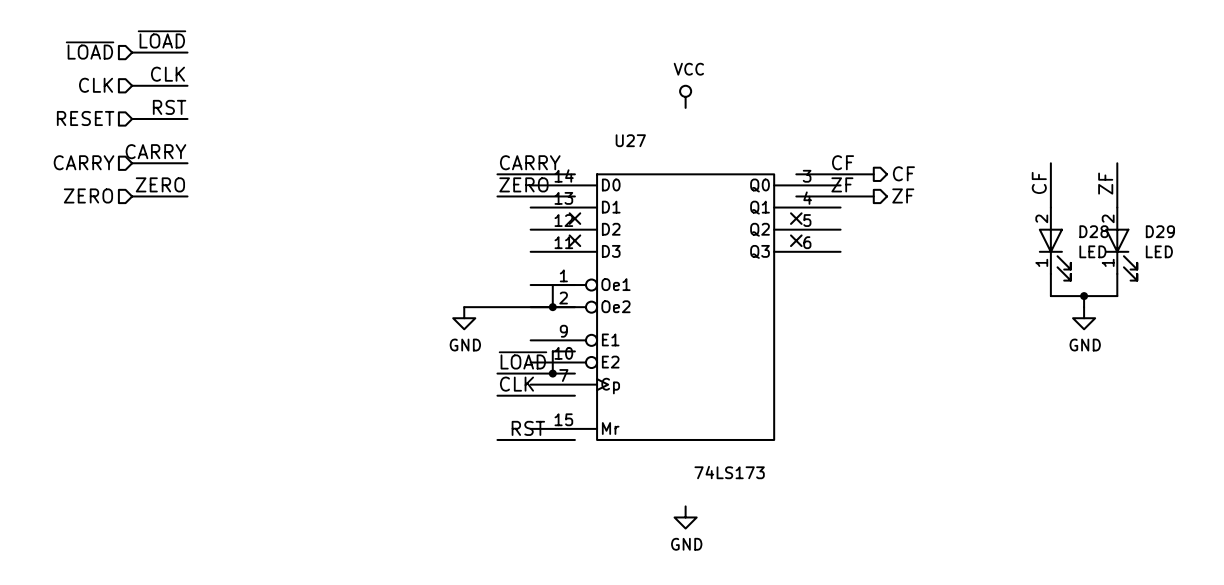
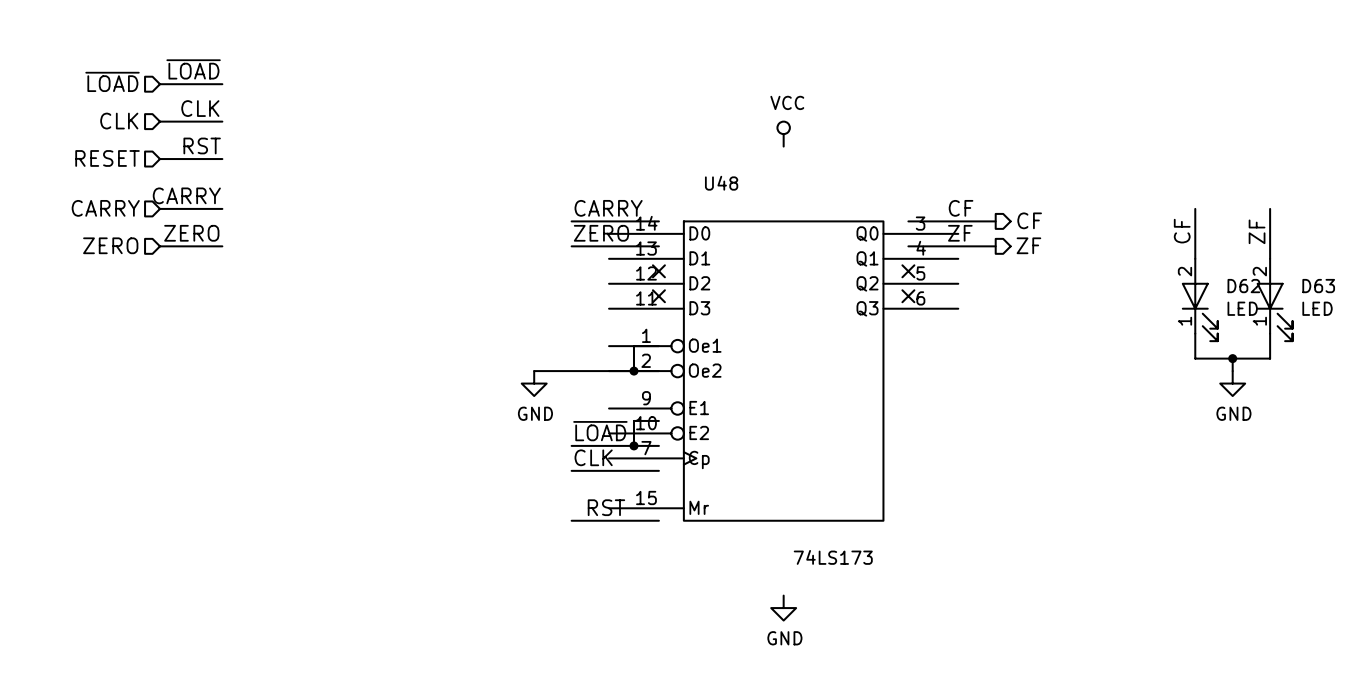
U27 name: U27 (630, 140) -> U48 (721, 183)
D28 name: D28 (1094, 231) -> D62 (1243, 286)
D29 name: D29 (1160, 231) -> D63 (1318, 286)

